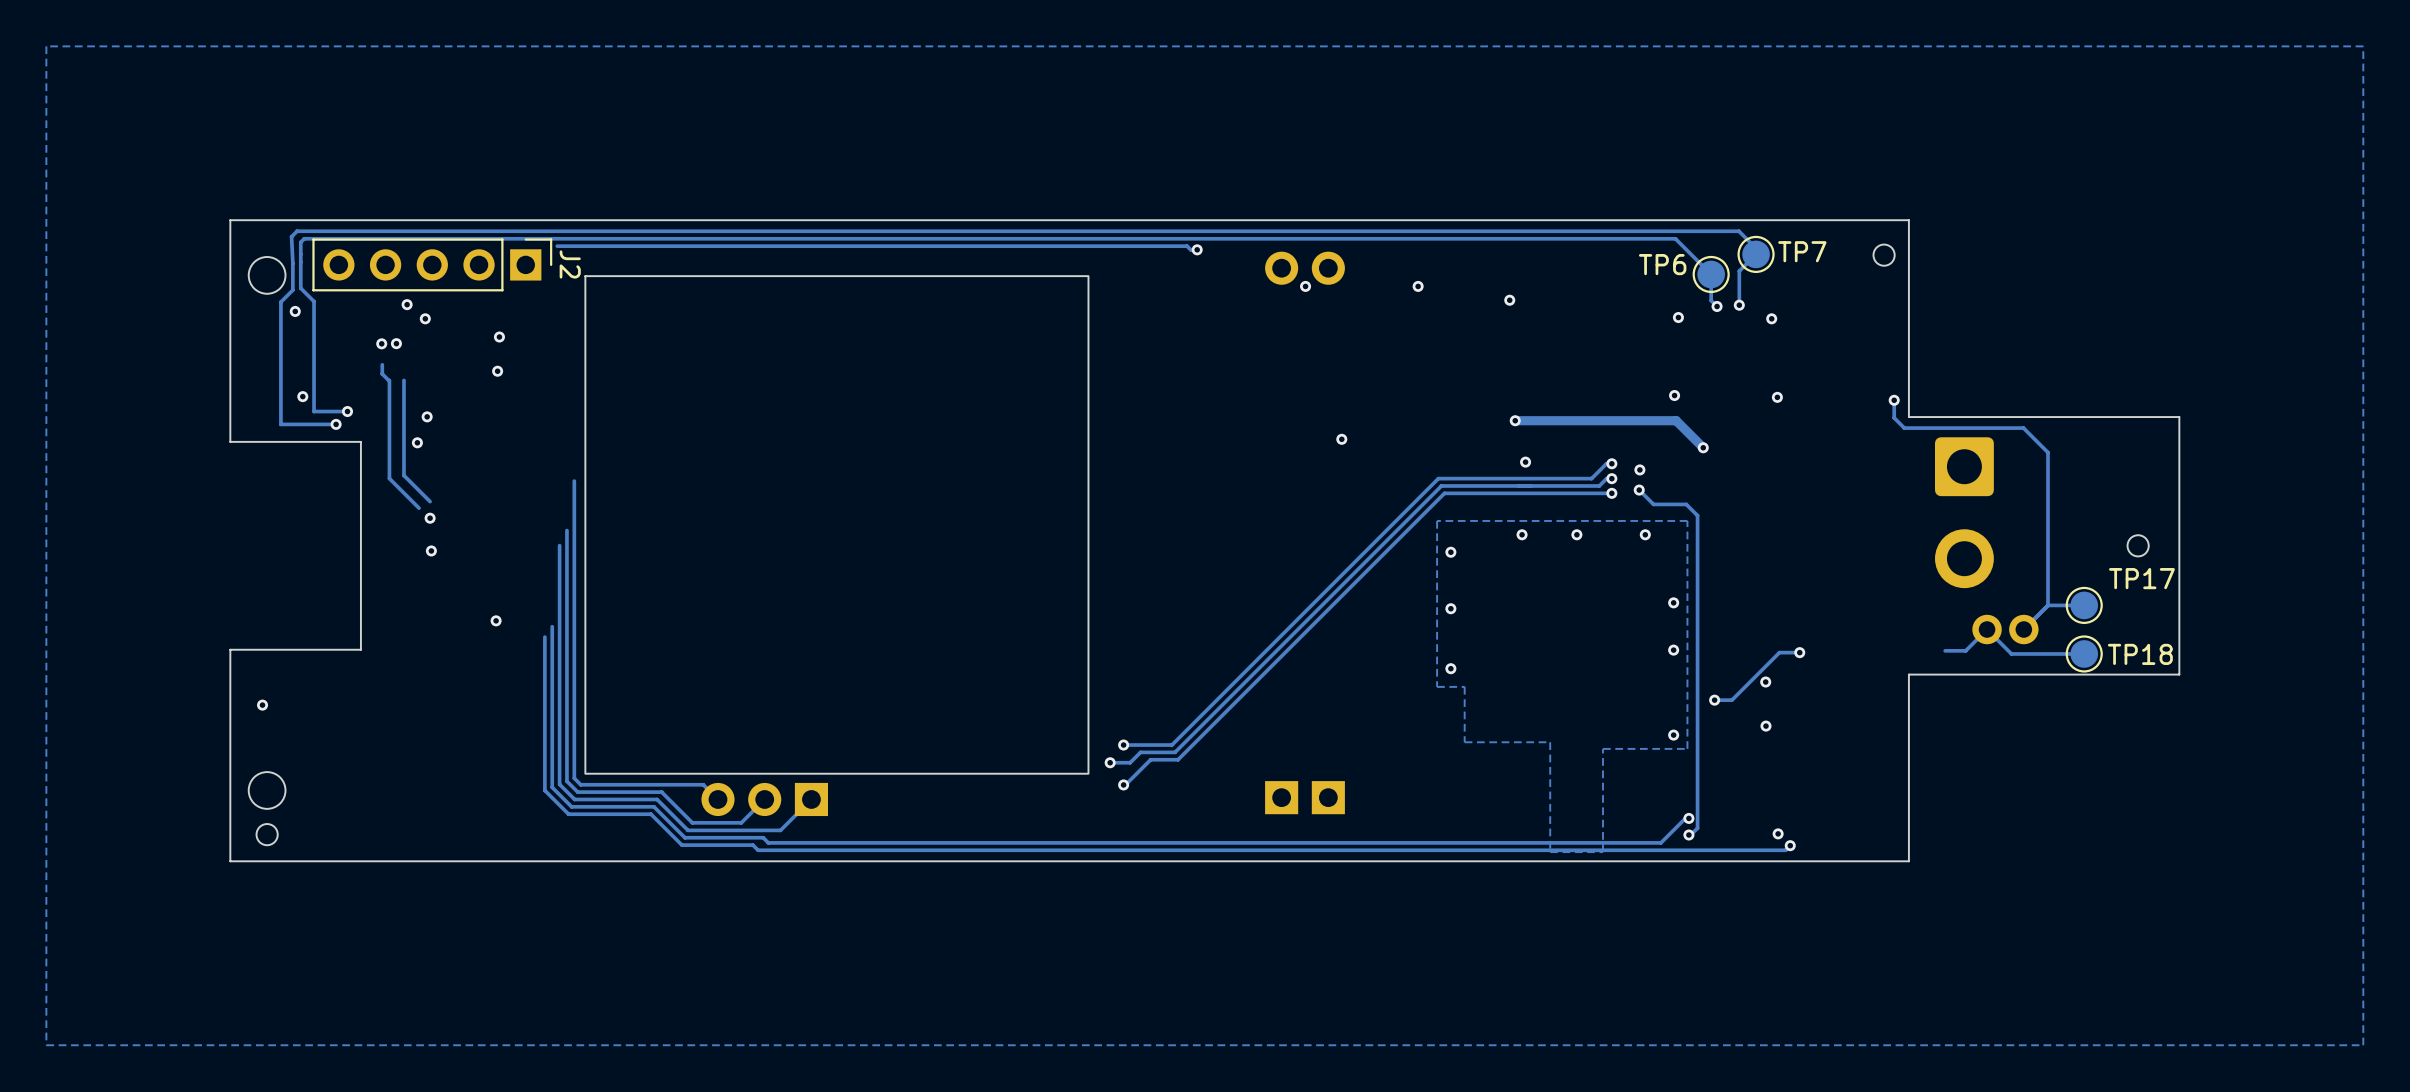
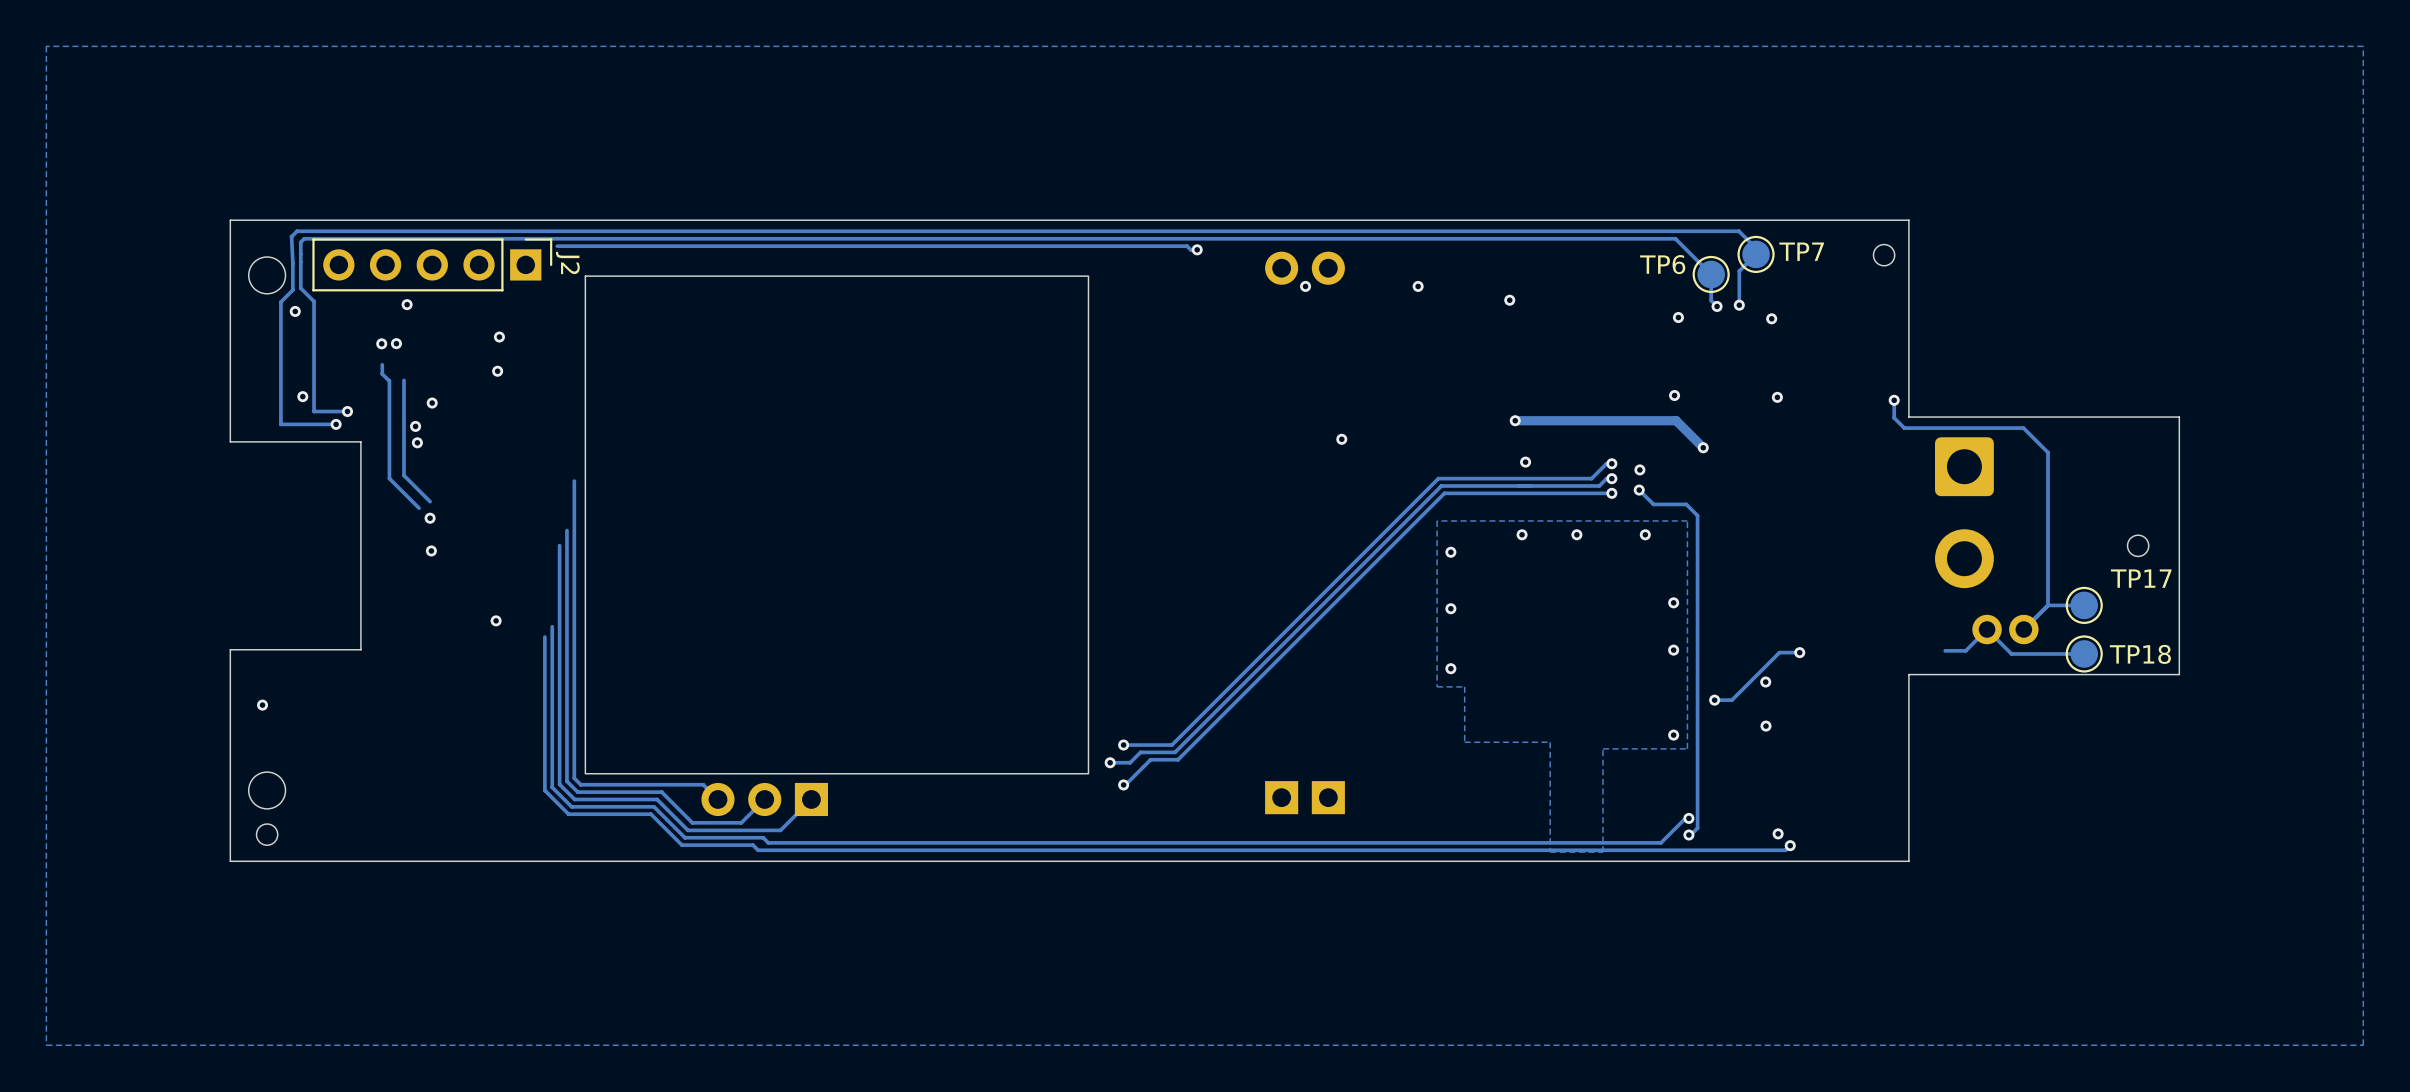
via: (425, 318) -> none
via: none -> (432, 403)
via: (427, 416) -> none
via: none -> (415, 426)

